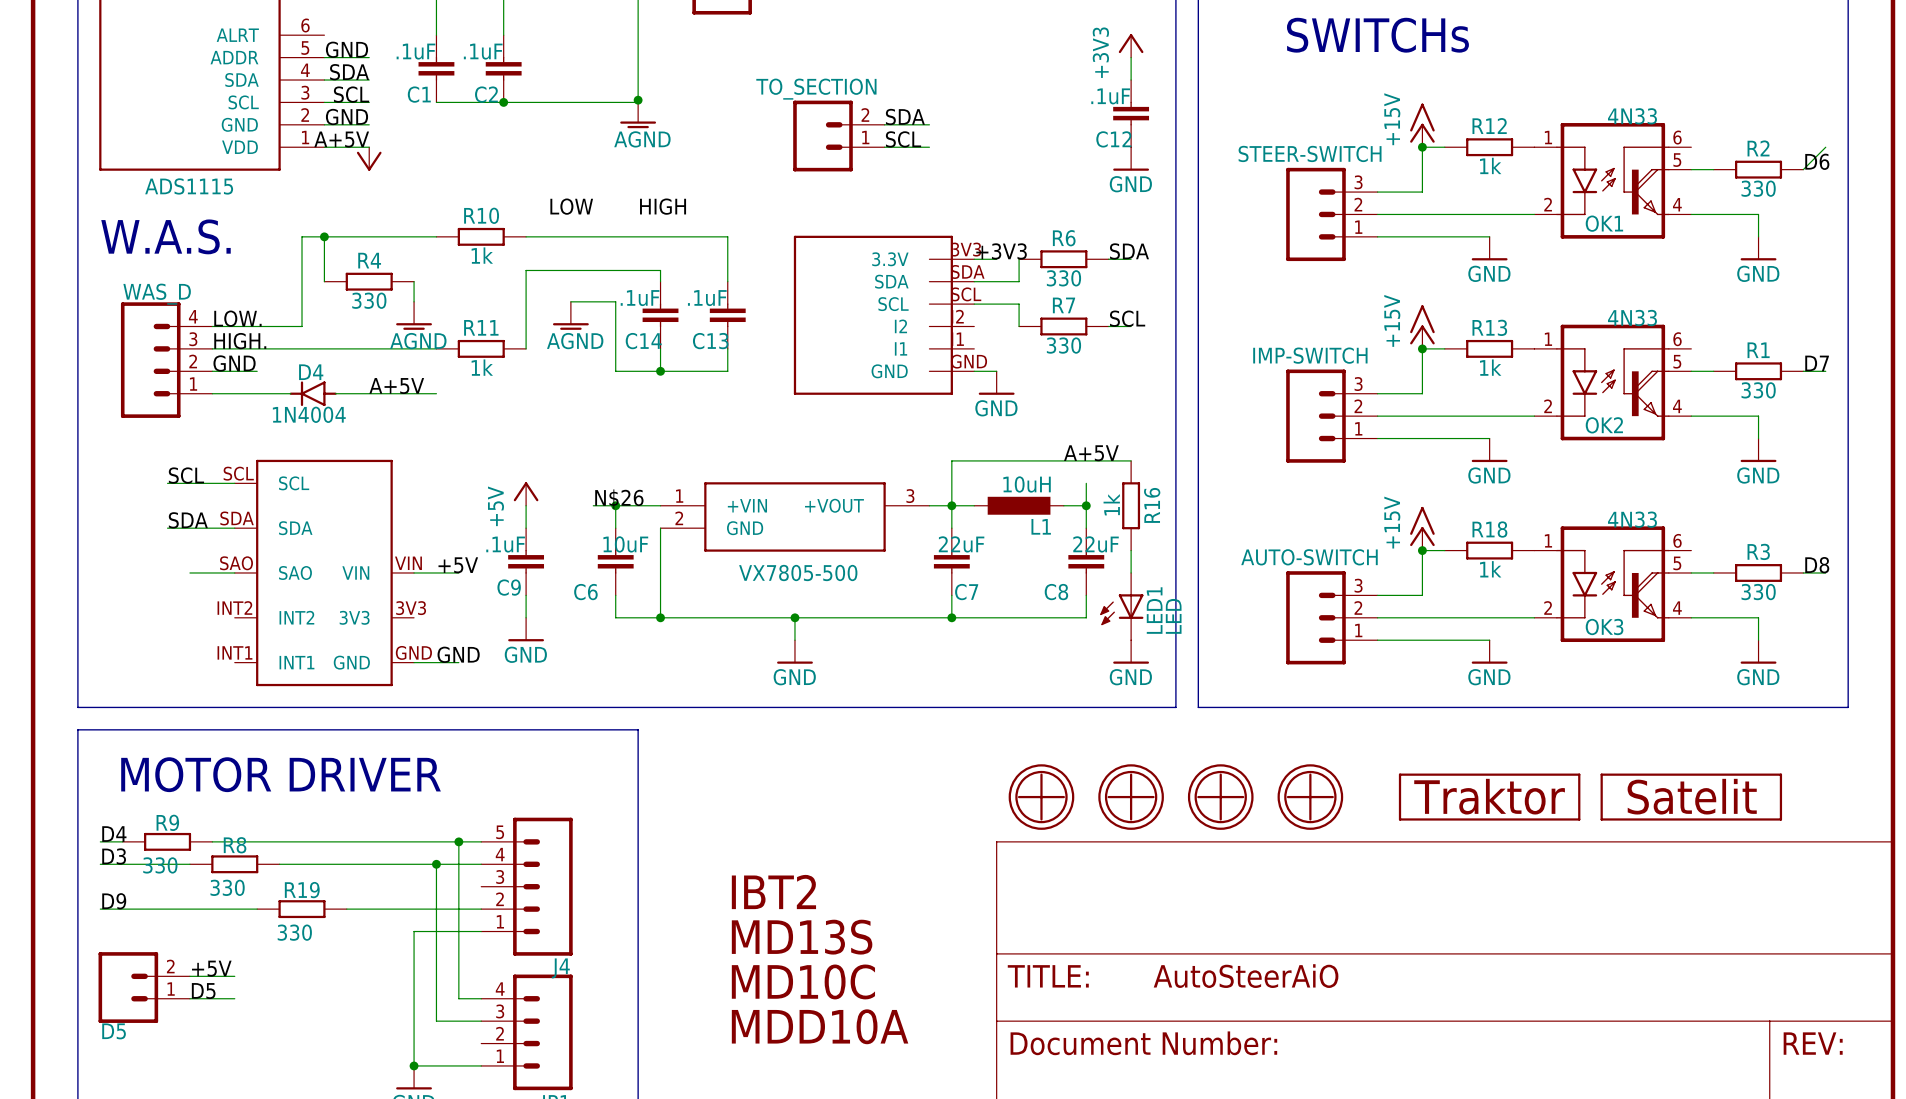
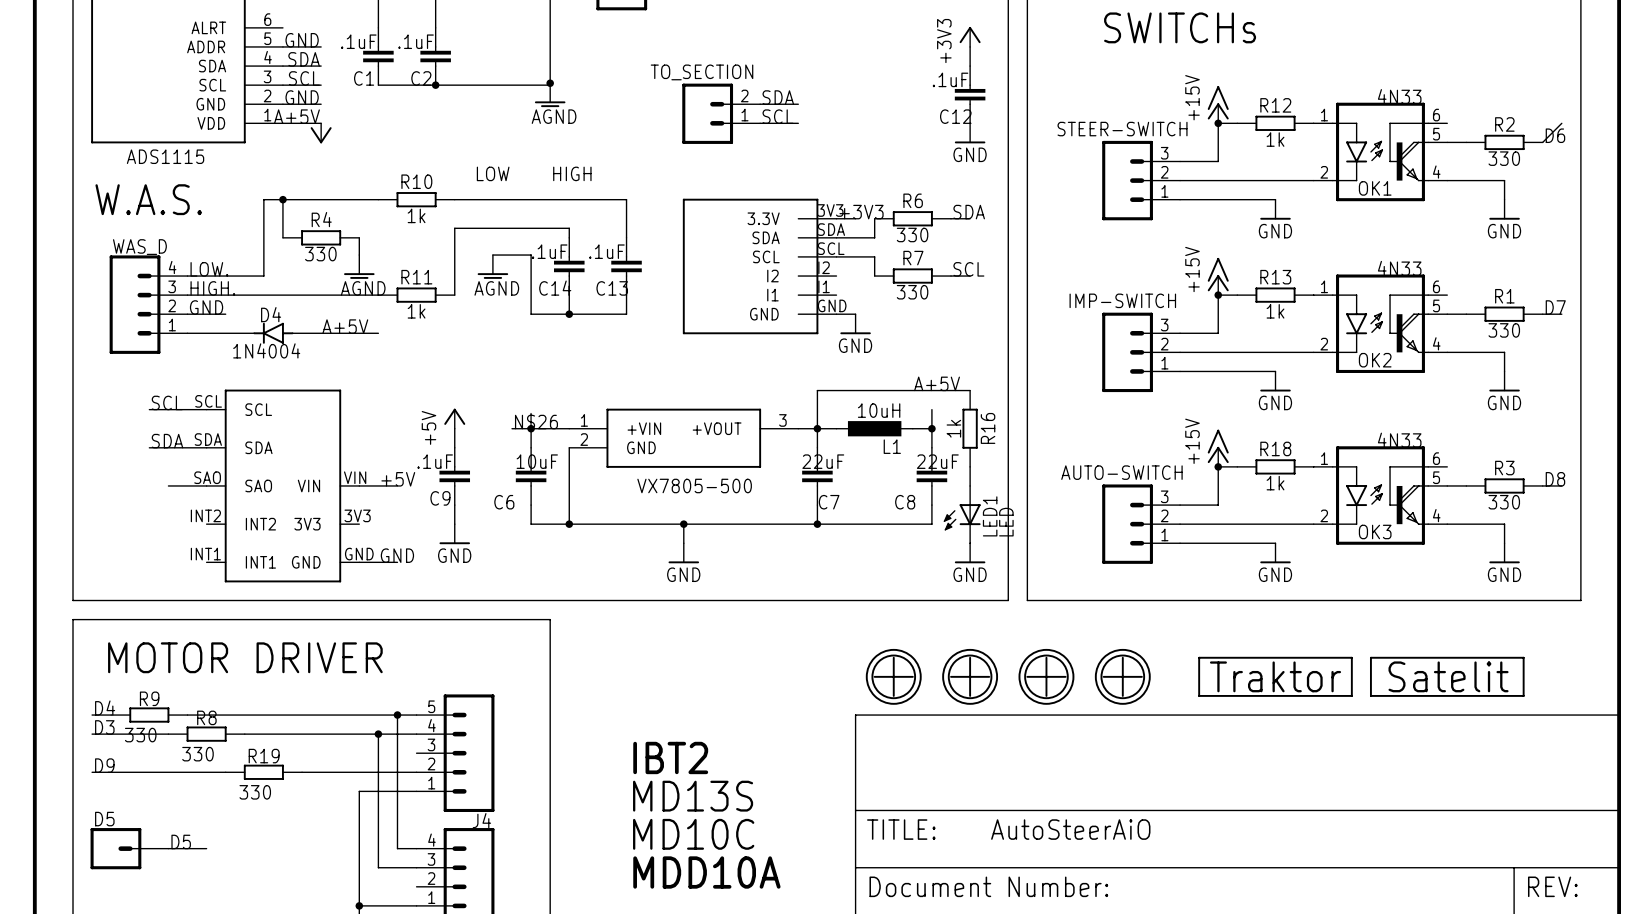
D5 symbol: [98, 952, 190, 1023] -> [90, 828, 169, 870]
label: +5V (211, 968) -> none
wire: (189, 976) (234, 976) -> none
D5 name position: D5 (114, 1031) -> D5 (104, 819)

